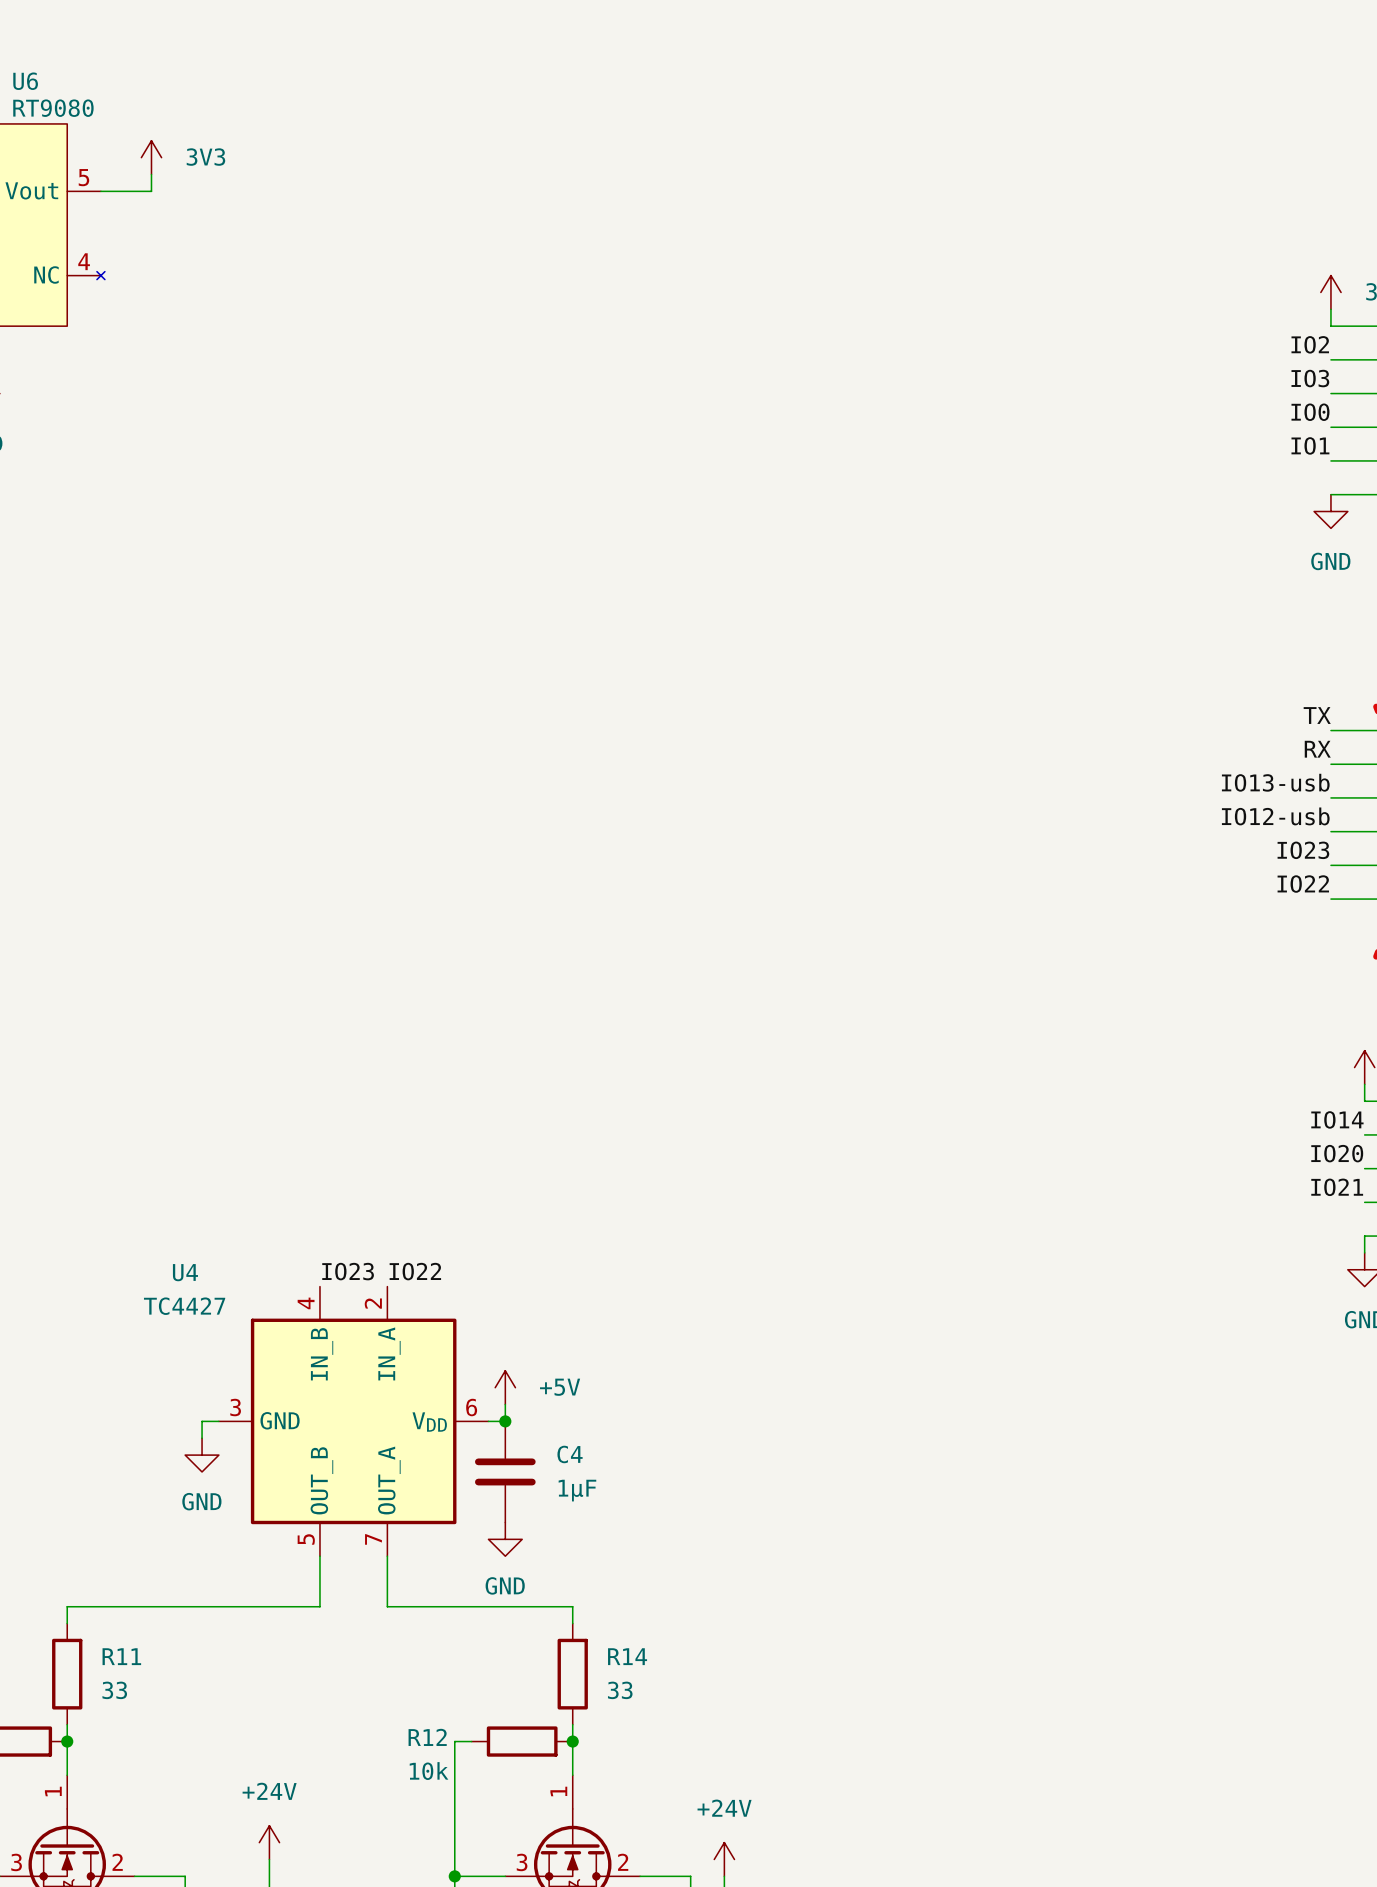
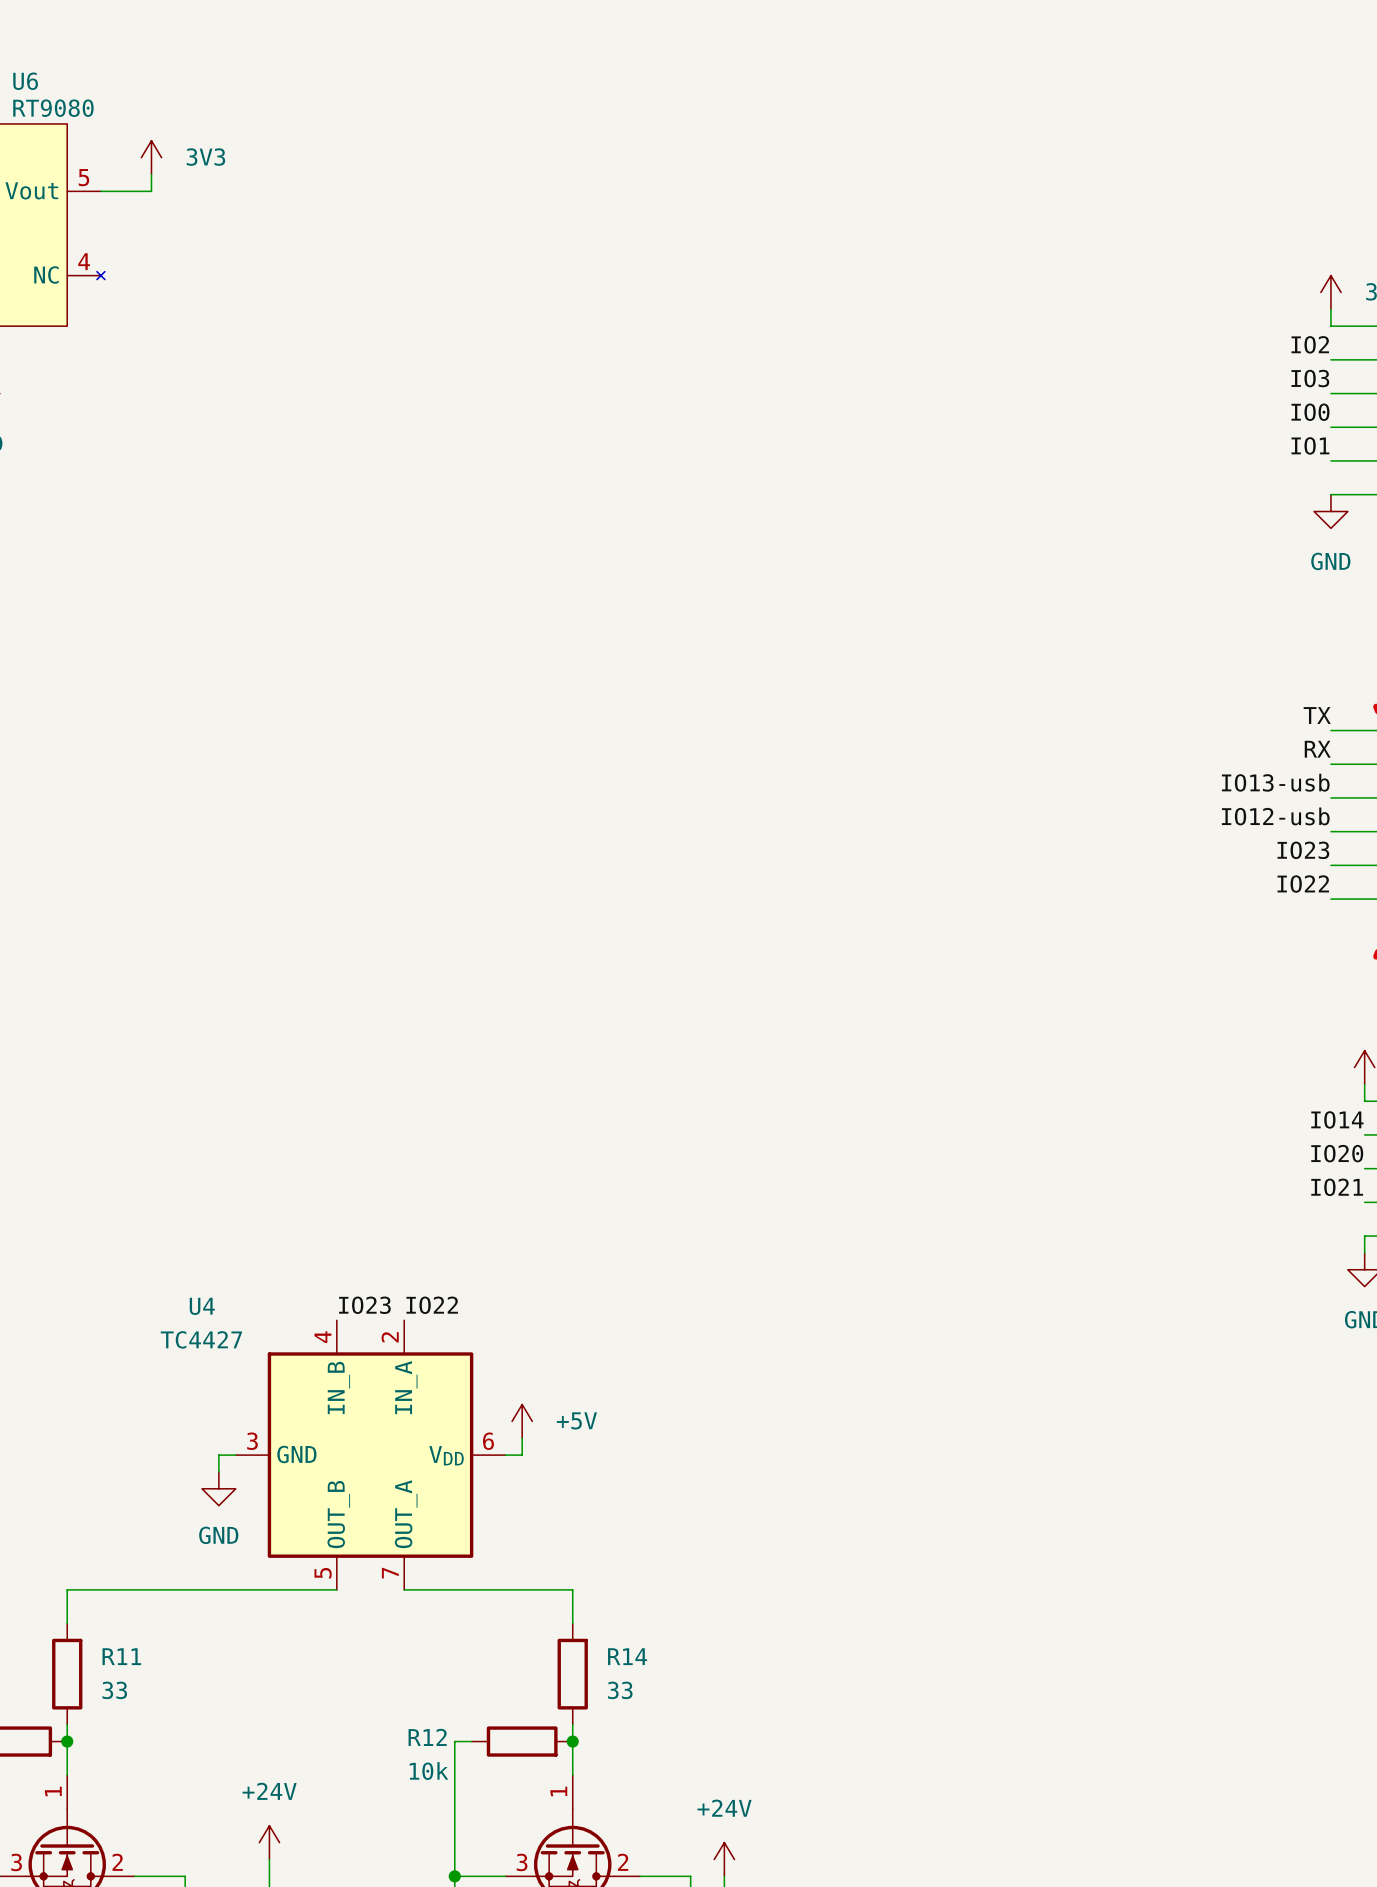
label position: IO23 (348, 1271) -> IO23 (364, 1305)
label position: IO22 (415, 1271) -> IO22 (432, 1305)
power symbol position: +5V (505, 1387) -> +5V (522, 1421)
wire: (505, 1404) (505, 1421) (488, 1421) -> (522, 1438) (522, 1455) (505, 1455)
wire: (218, 1421) (202, 1421) (202, 1438) -> (235, 1455) (218, 1455) (218, 1471)
U4 position: (353, 1421) -> (370, 1455)
junction: (505, 1421) -> none
power symbol position: GND (202, 1455) -> GND (218, 1488)
C4: 1μF (505, 1471) -> none
power symbol: GND (505, 1539) -> none
wire: (319, 1556) (319, 1606) (67, 1606) -> (336, 1589) (67, 1589) (67, 1606)
wire: (387, 1556) (387, 1606) (572, 1606) -> (404, 1589) (572, 1589) (572, 1606)

